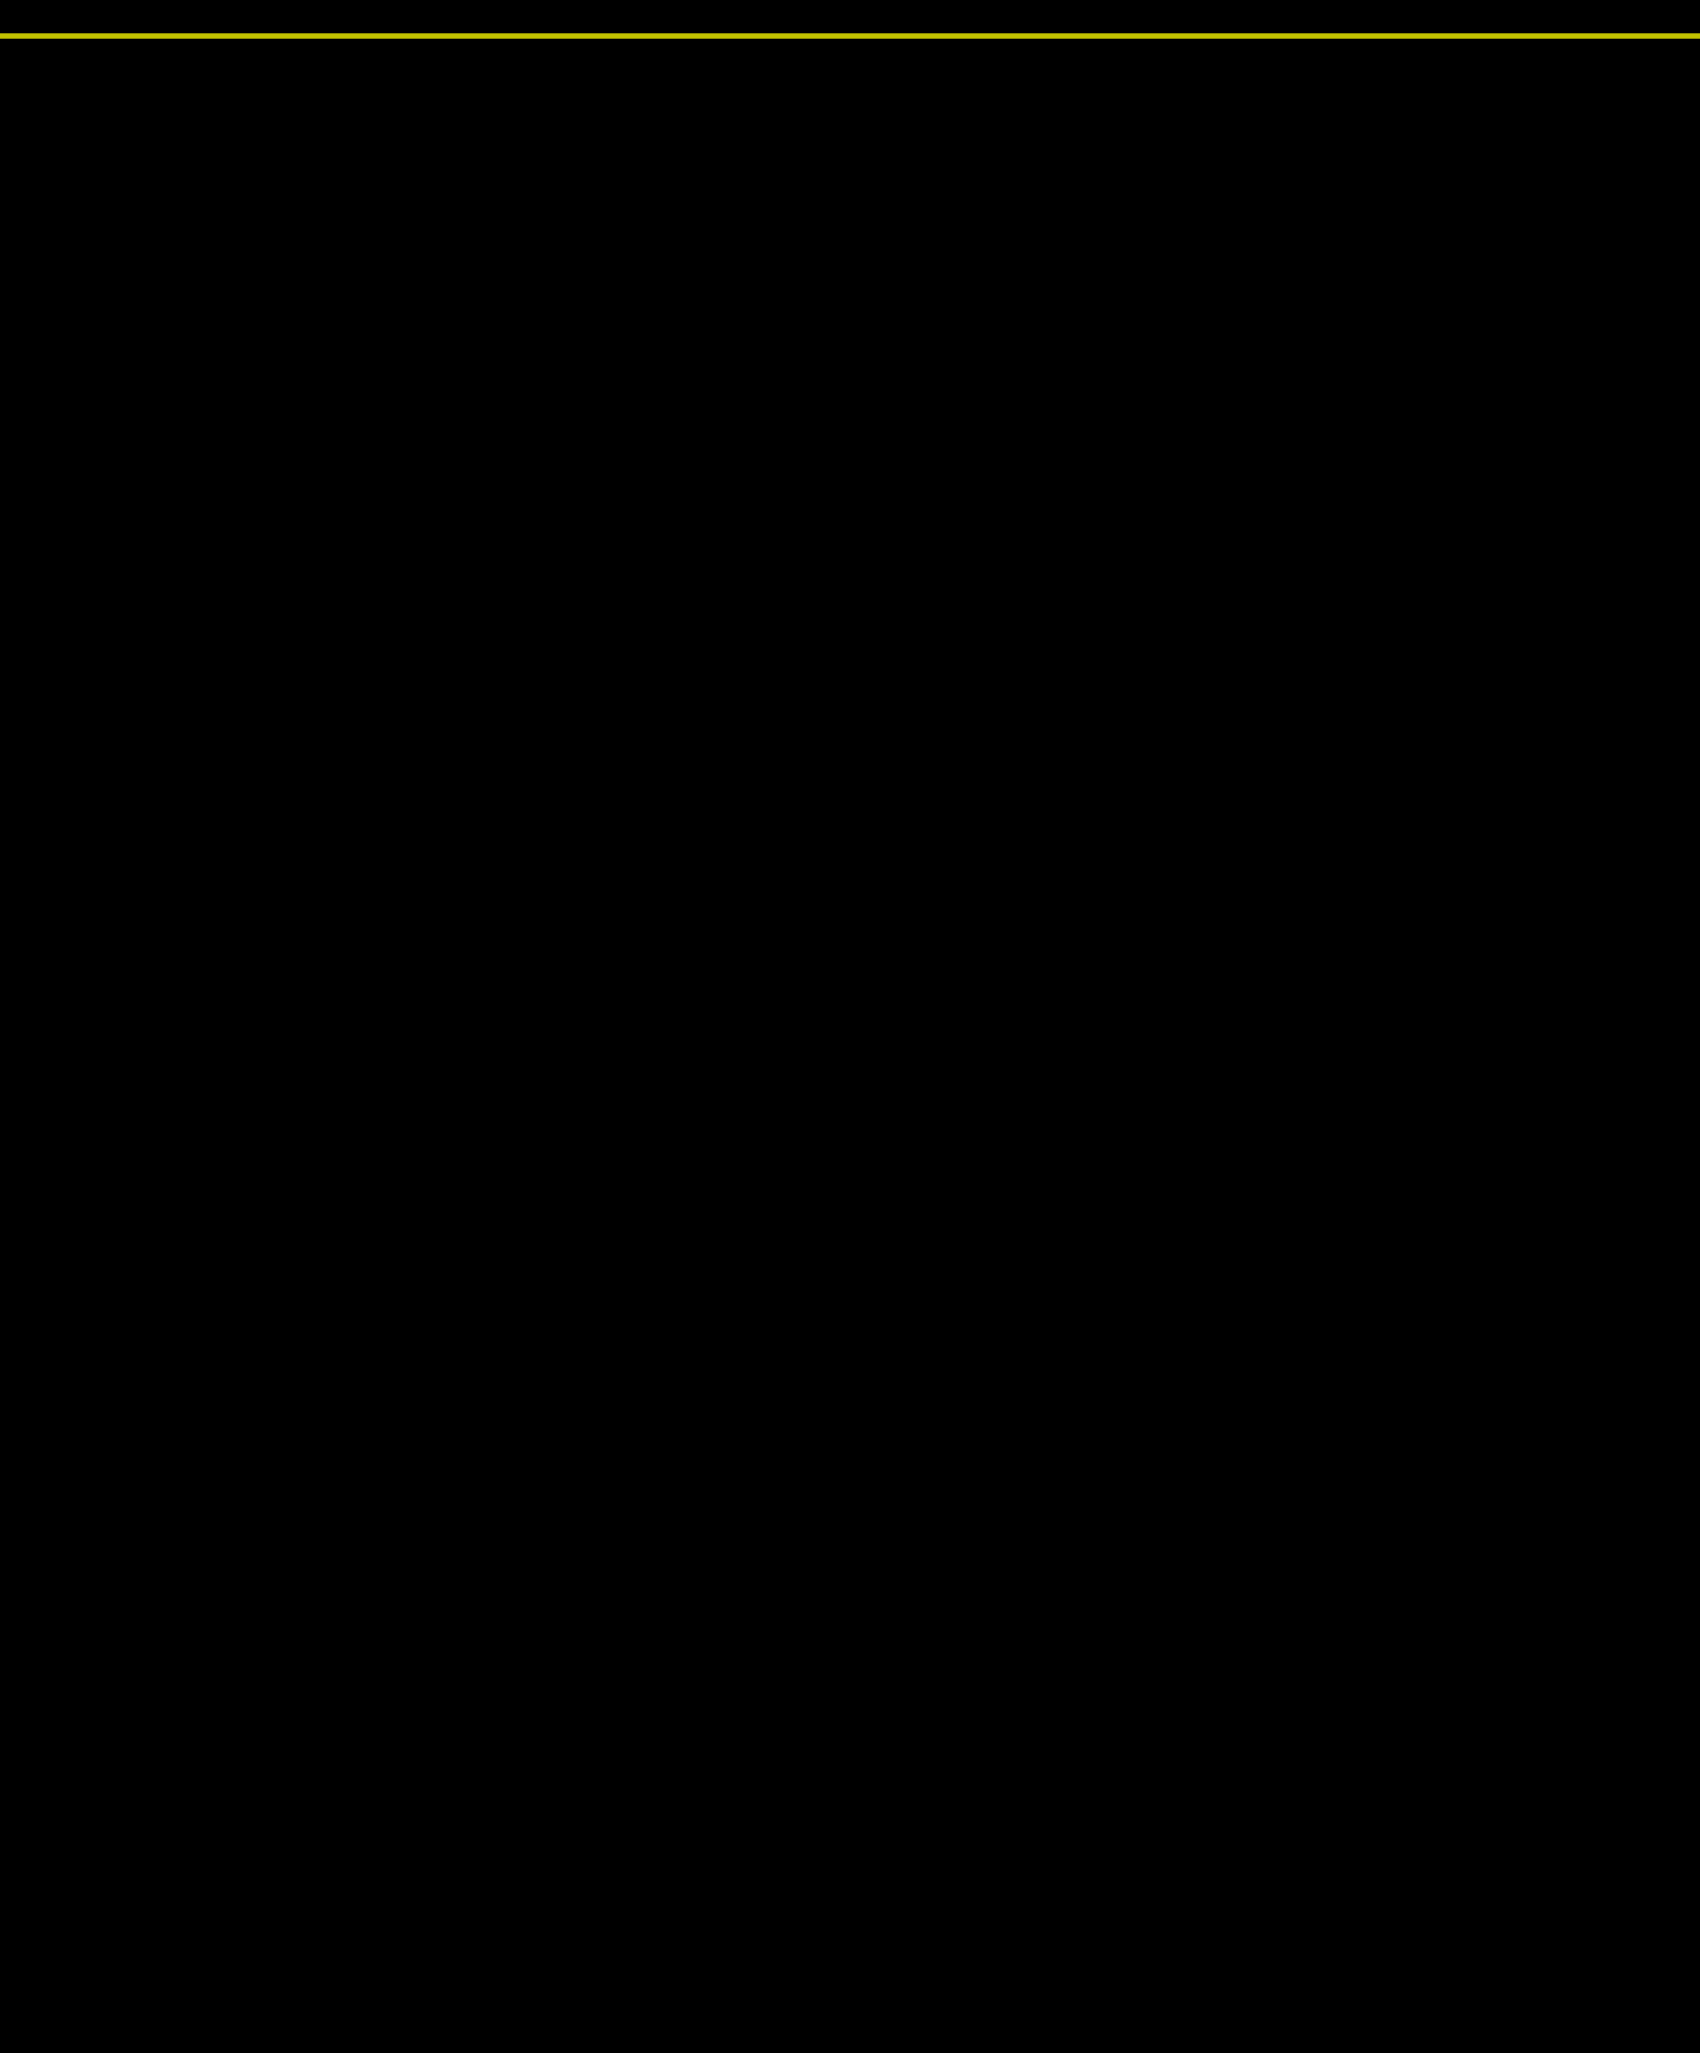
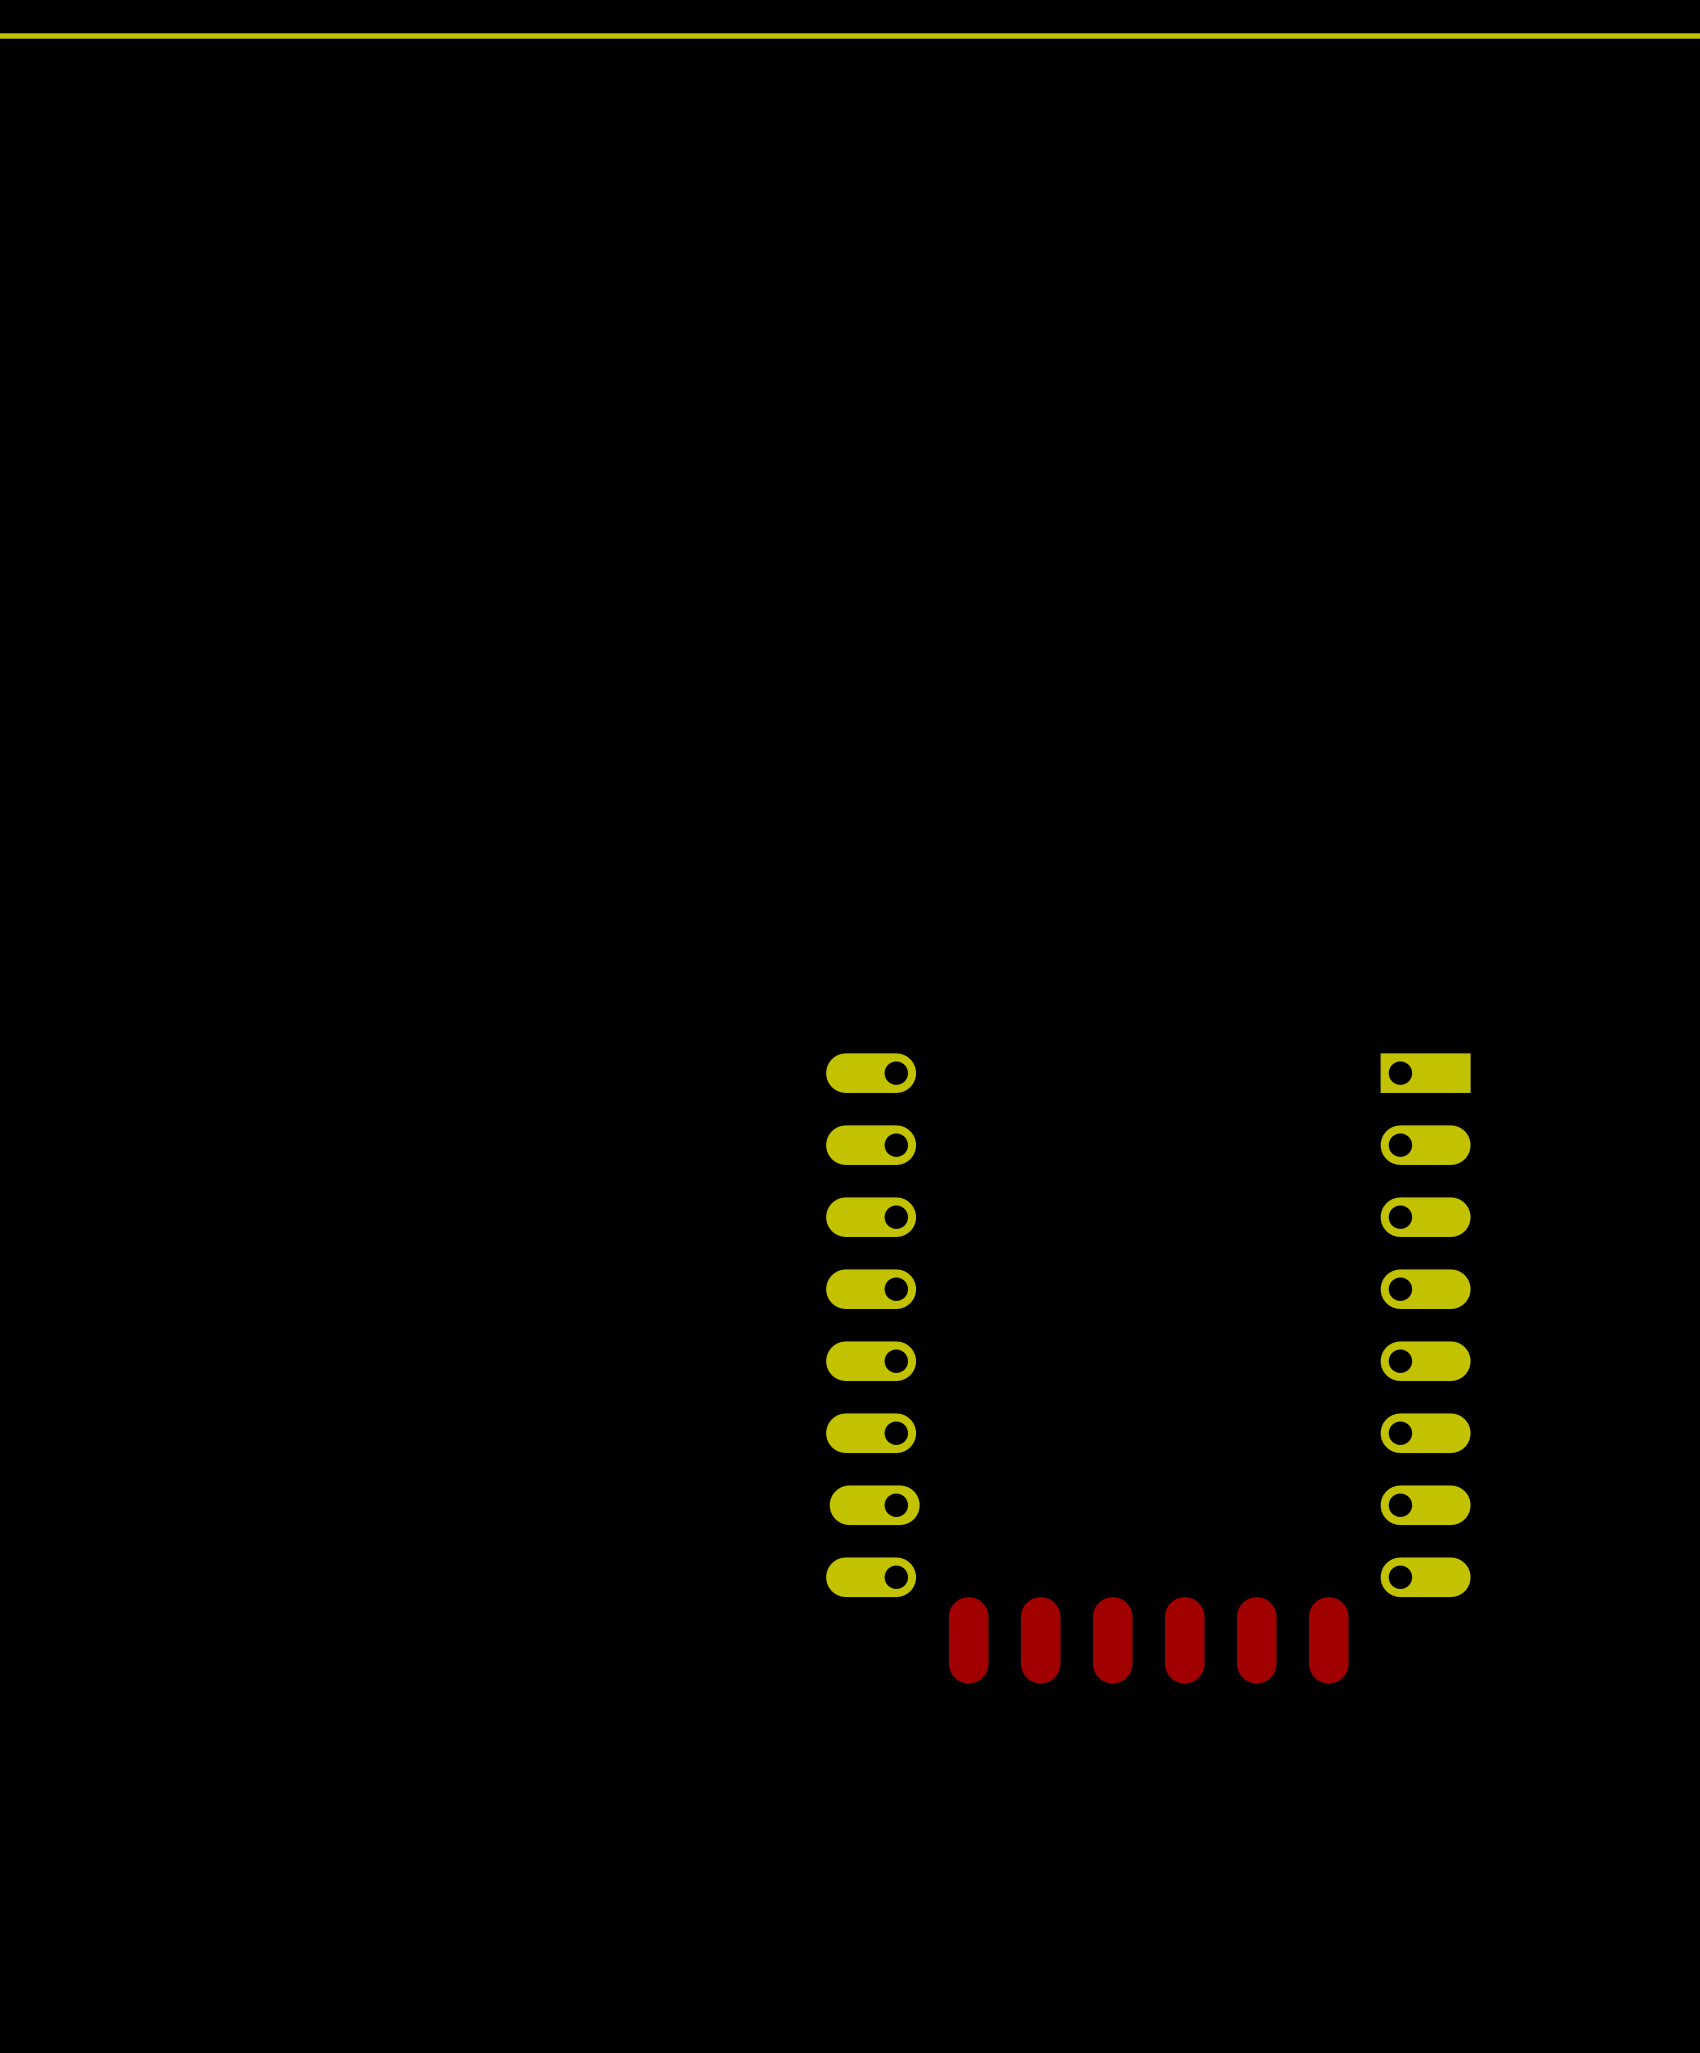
part: none -> (1148, 1368)

